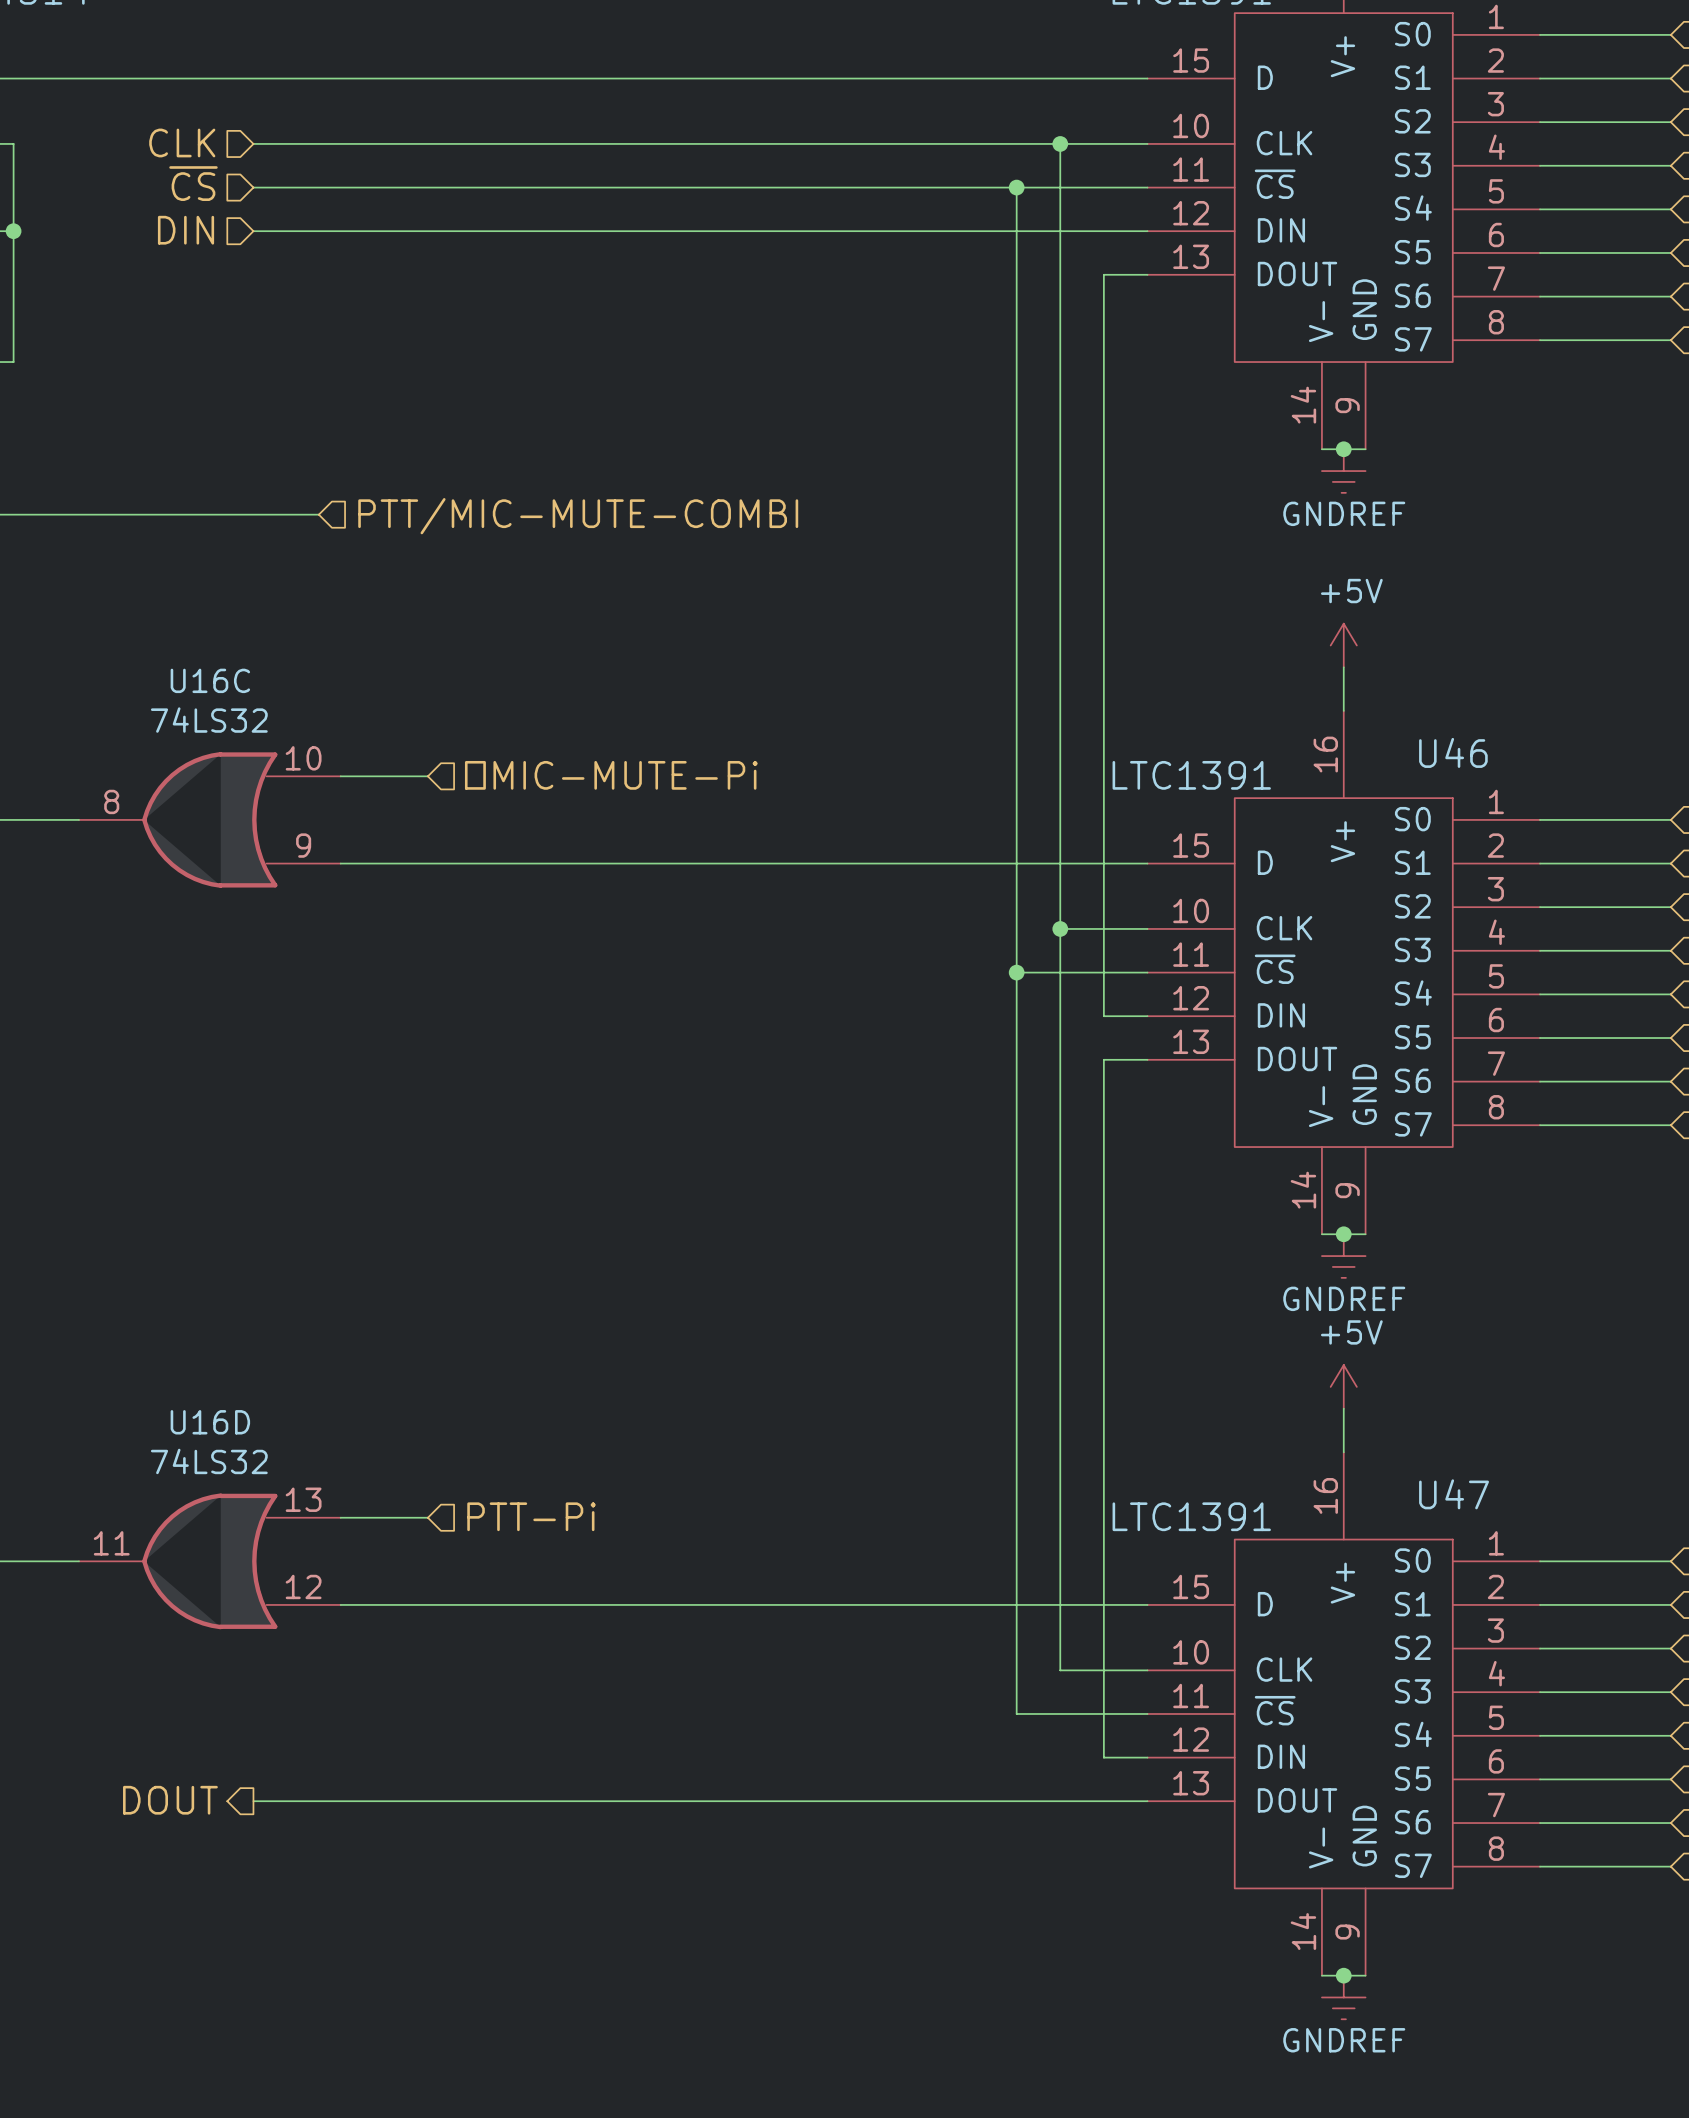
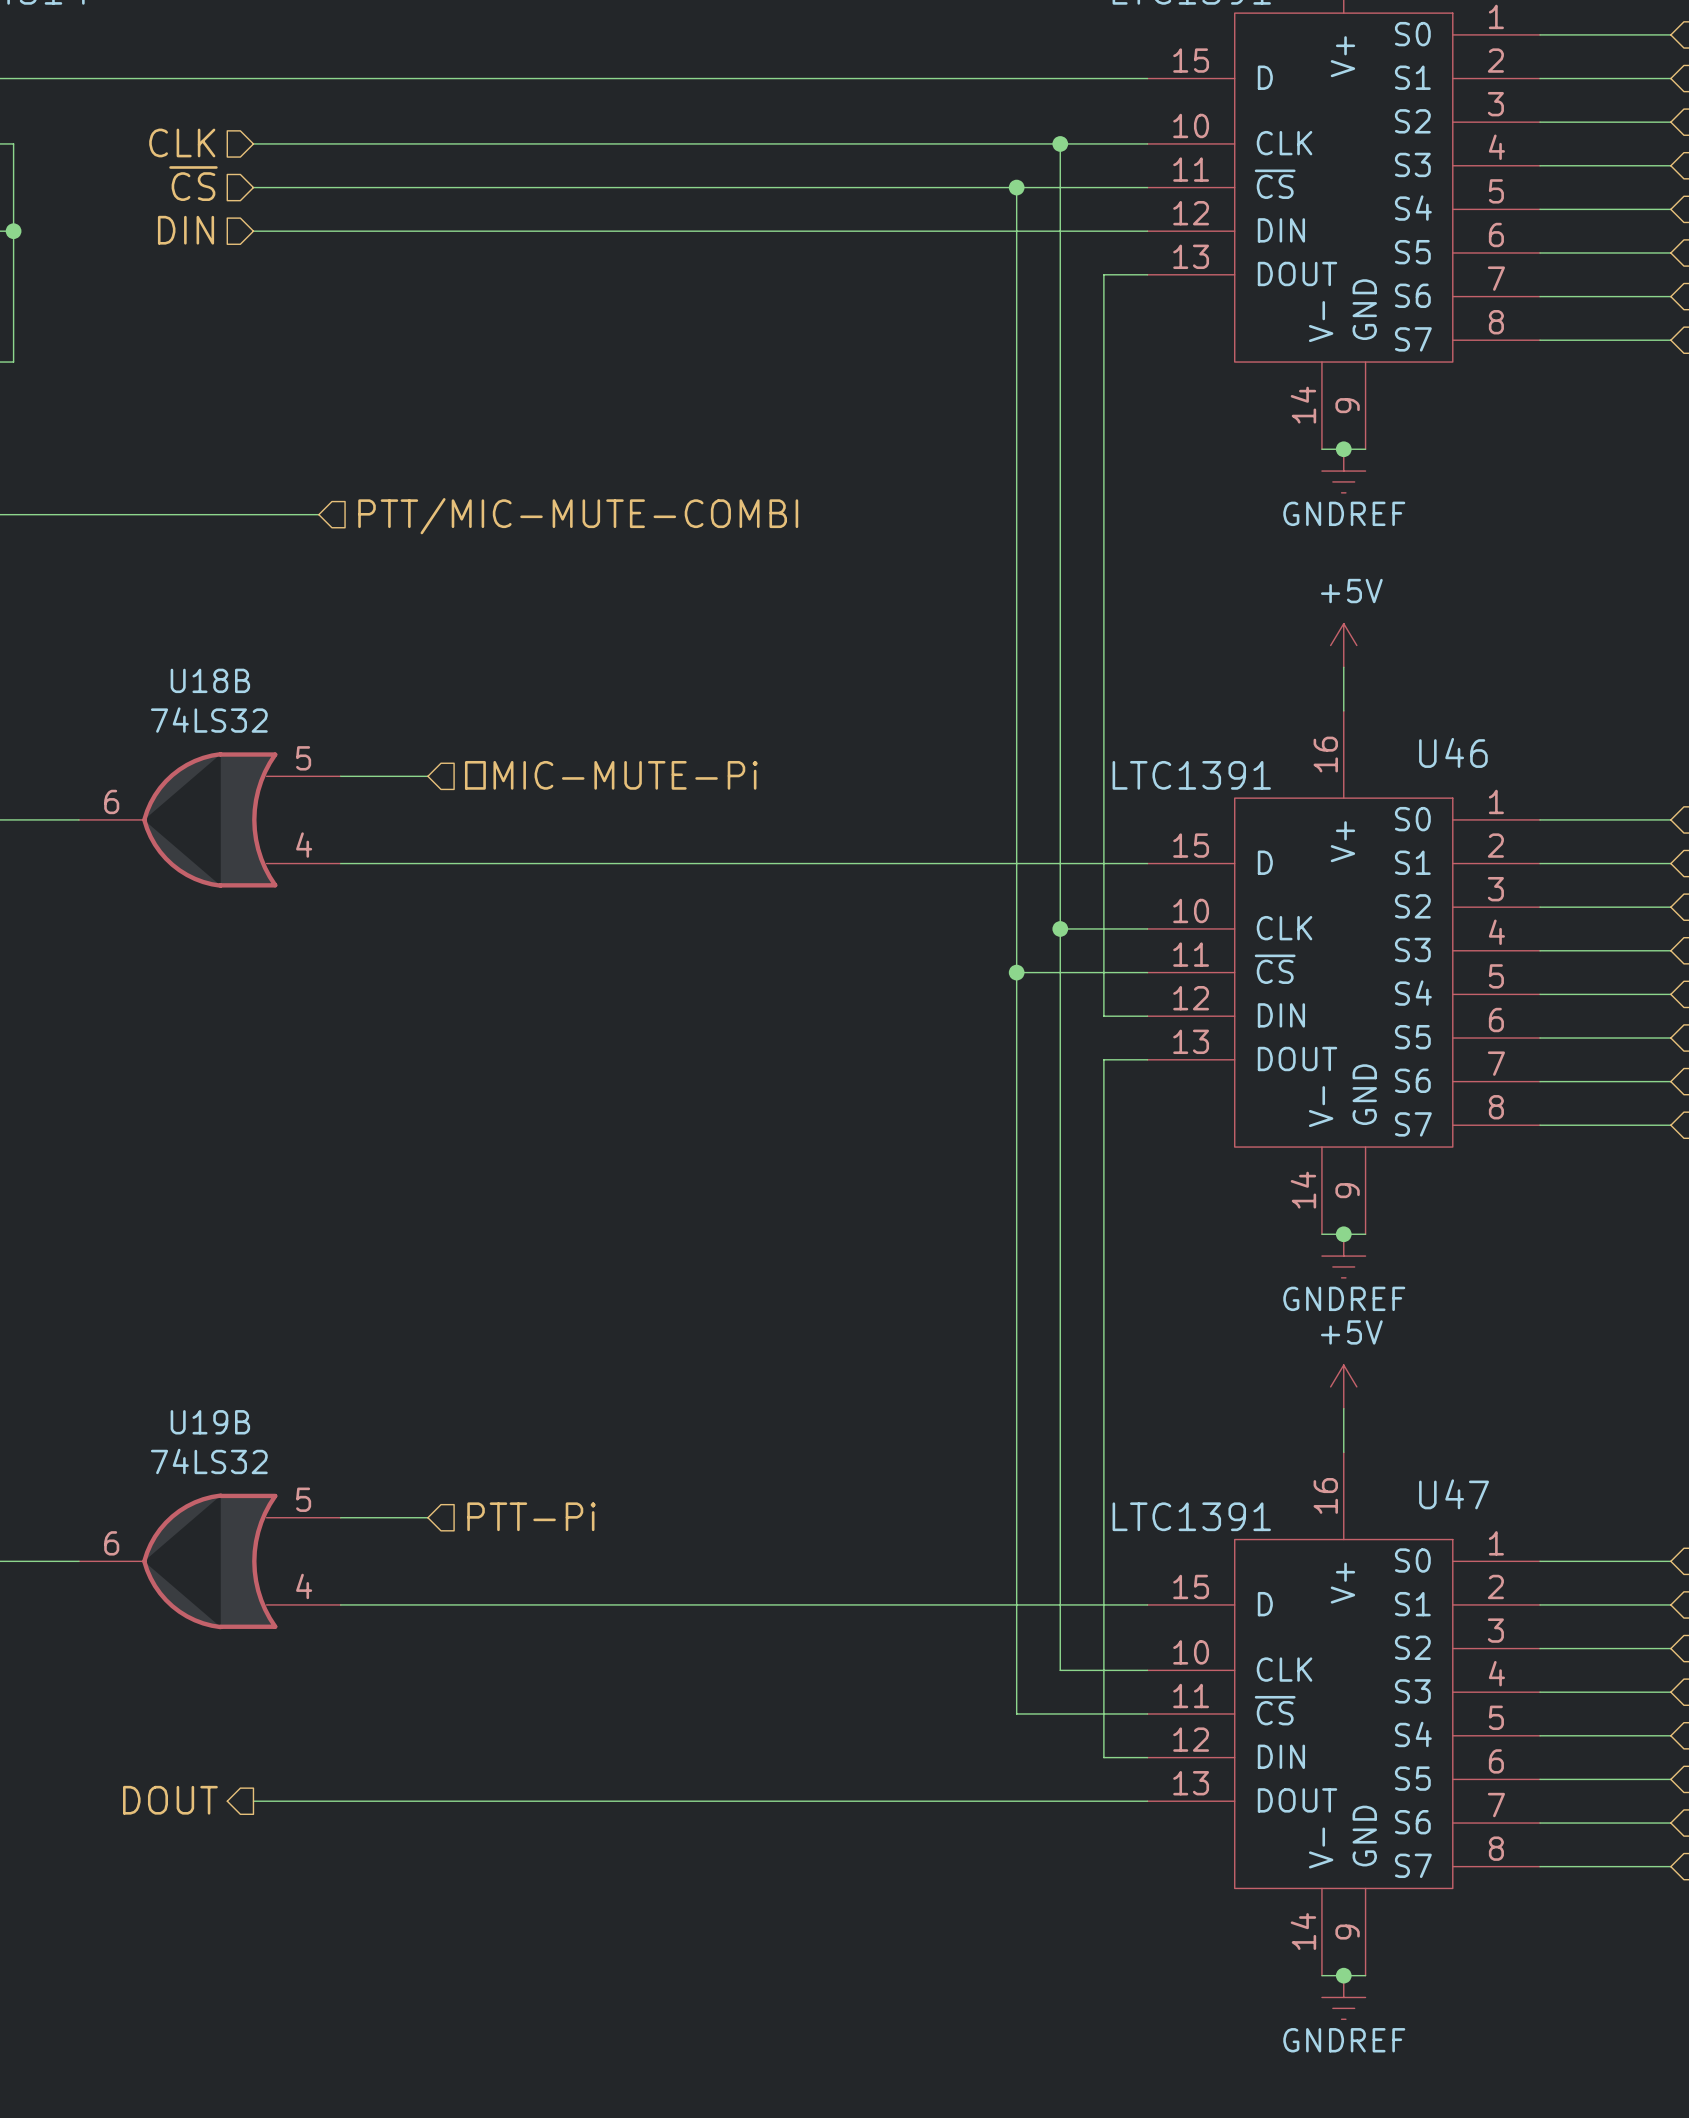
U16C name: U16C (210, 680) -> U18B (210, 680)
U16C pin number: 10 (303, 758) -> 5 (303, 758)
U16C pin number: 8 (111, 801) -> 6 (111, 801)
U16C pin number: 9 (303, 845) -> 4 (304, 845)
U16D name: U16D (210, 1422) -> U19B (210, 1422)
U16D pin number: 13 (303, 1499) -> 5 (303, 1499)
U16D pin number: 11 (111, 1543) -> 6 (111, 1543)
U16D pin number: 12 (303, 1586) -> 4 (304, 1586)

